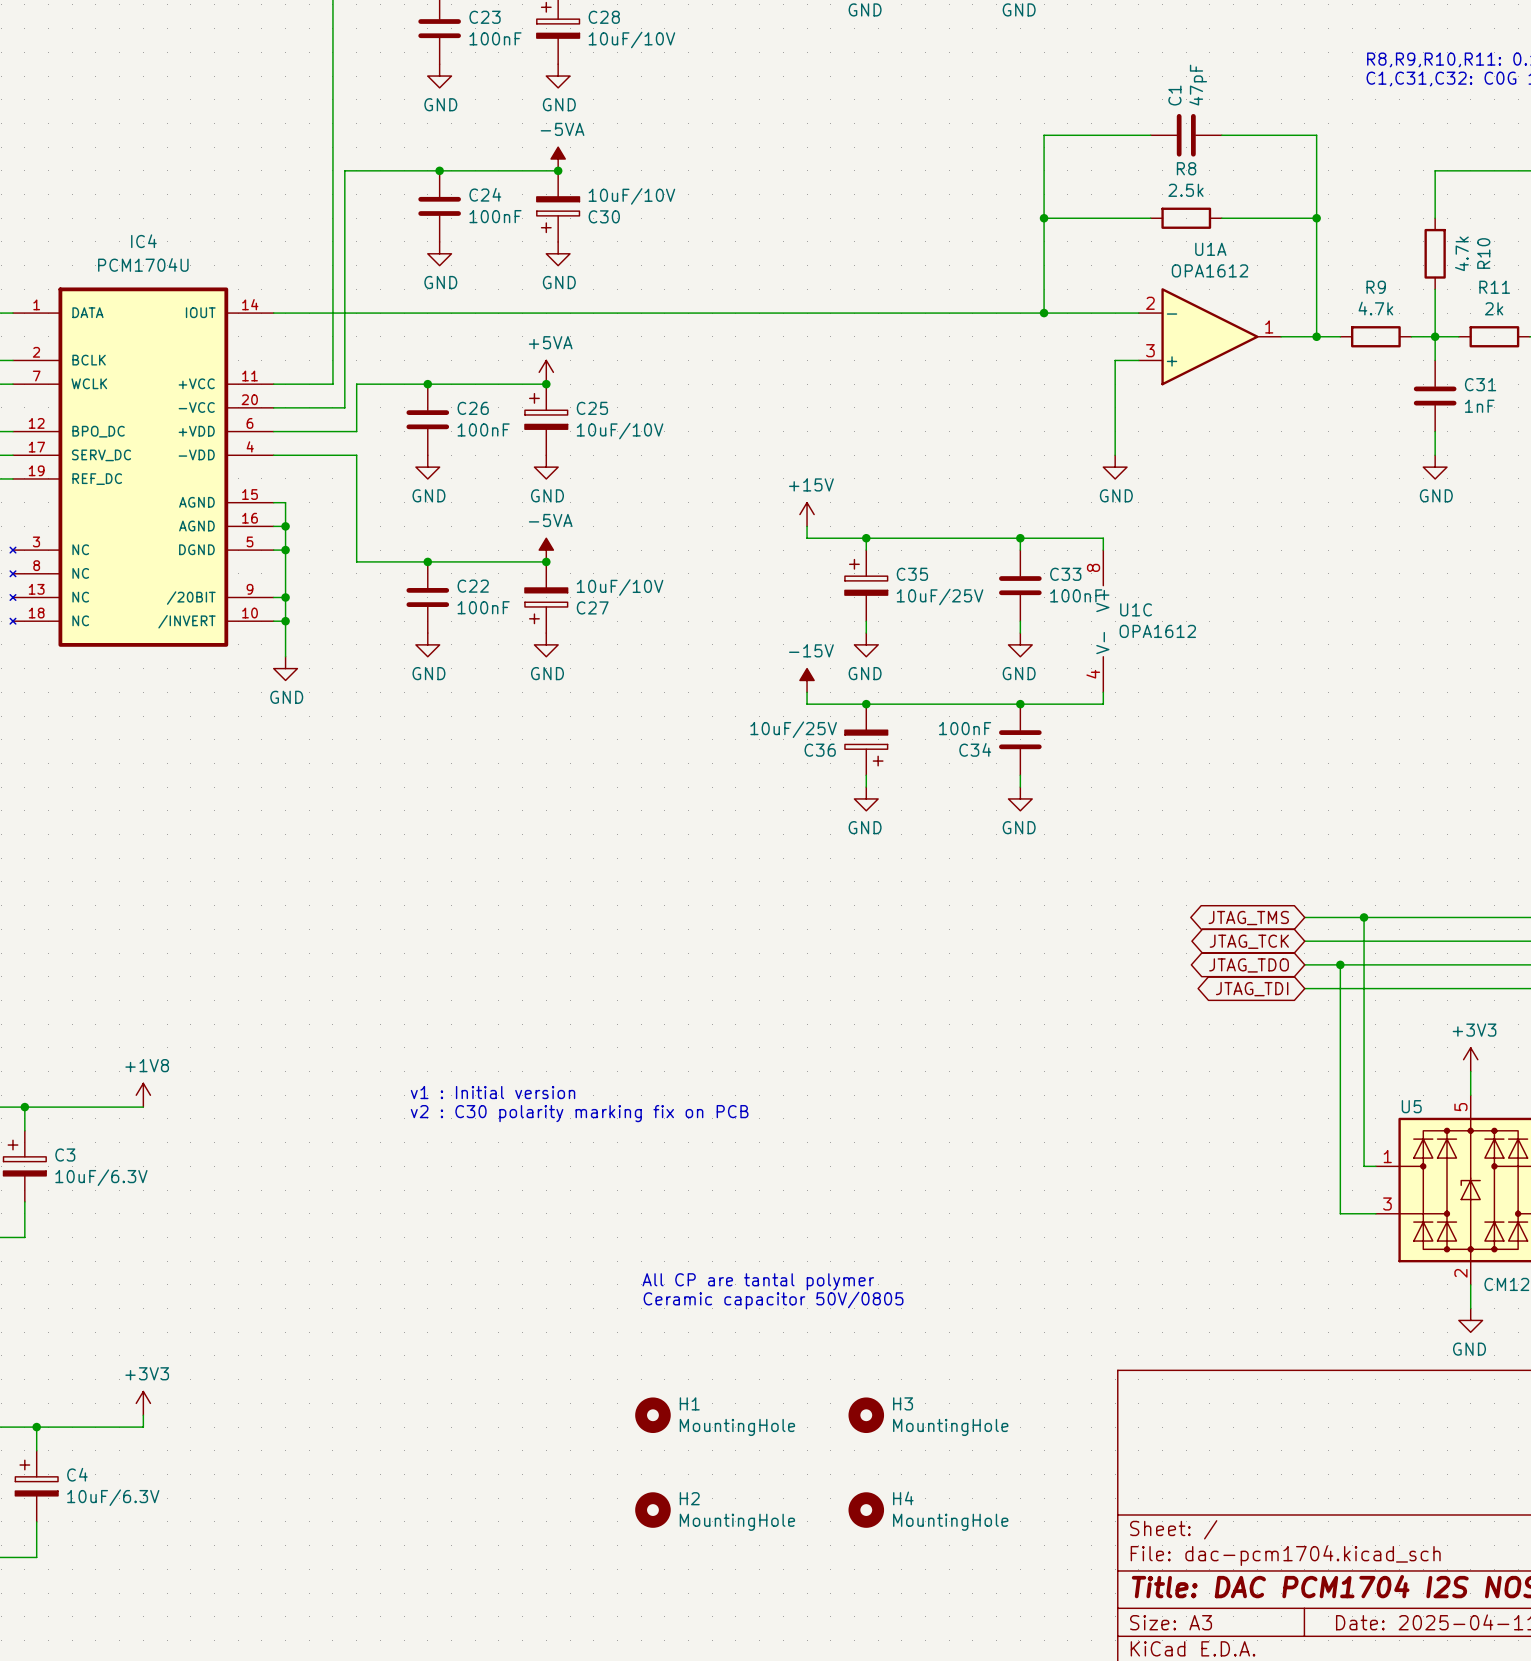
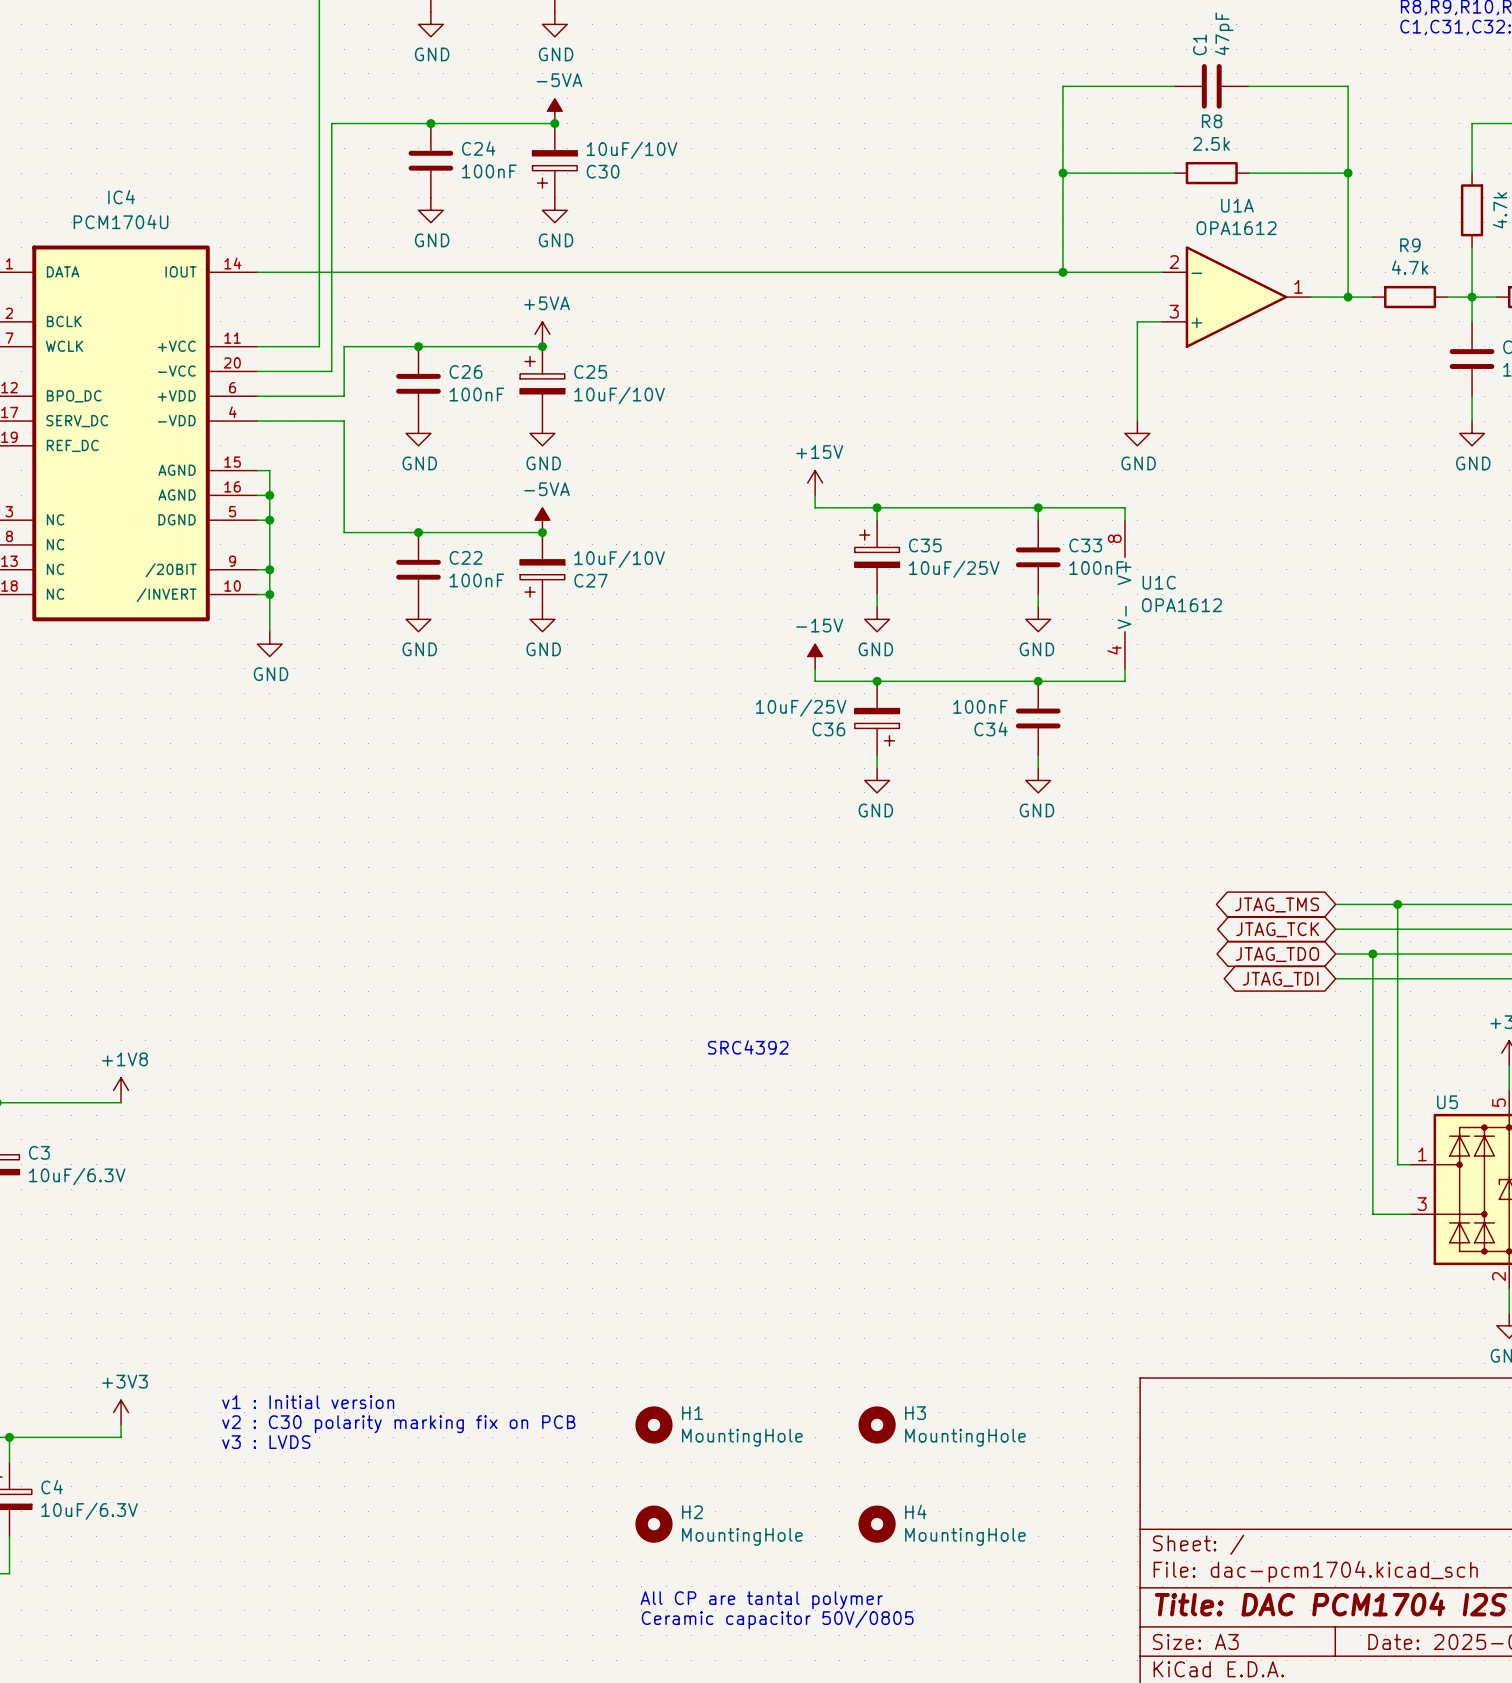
text: none -> SRC4392 (748, 1047)
text: v1 : Initial version (492, 1092) -> none
text: v2 : C30 polarity marking fix on PCB (579, 1113) -> none
text: All CP are tantal polymer (758, 1281) -> none
text: Ceramic capacitor 50V/0805 (773, 1300) -> none
text: none -> v1 : Initial version (308, 1402)
text: none -> v2 : C30 polarity marking fix on PCB (398, 1424)
text: none -> v3 : LVDS (266, 1442)
text: none -> All CP are tantal polymer (761, 1600)
text: none -> Ceramic capacitor 50V/0805 (777, 1619)

